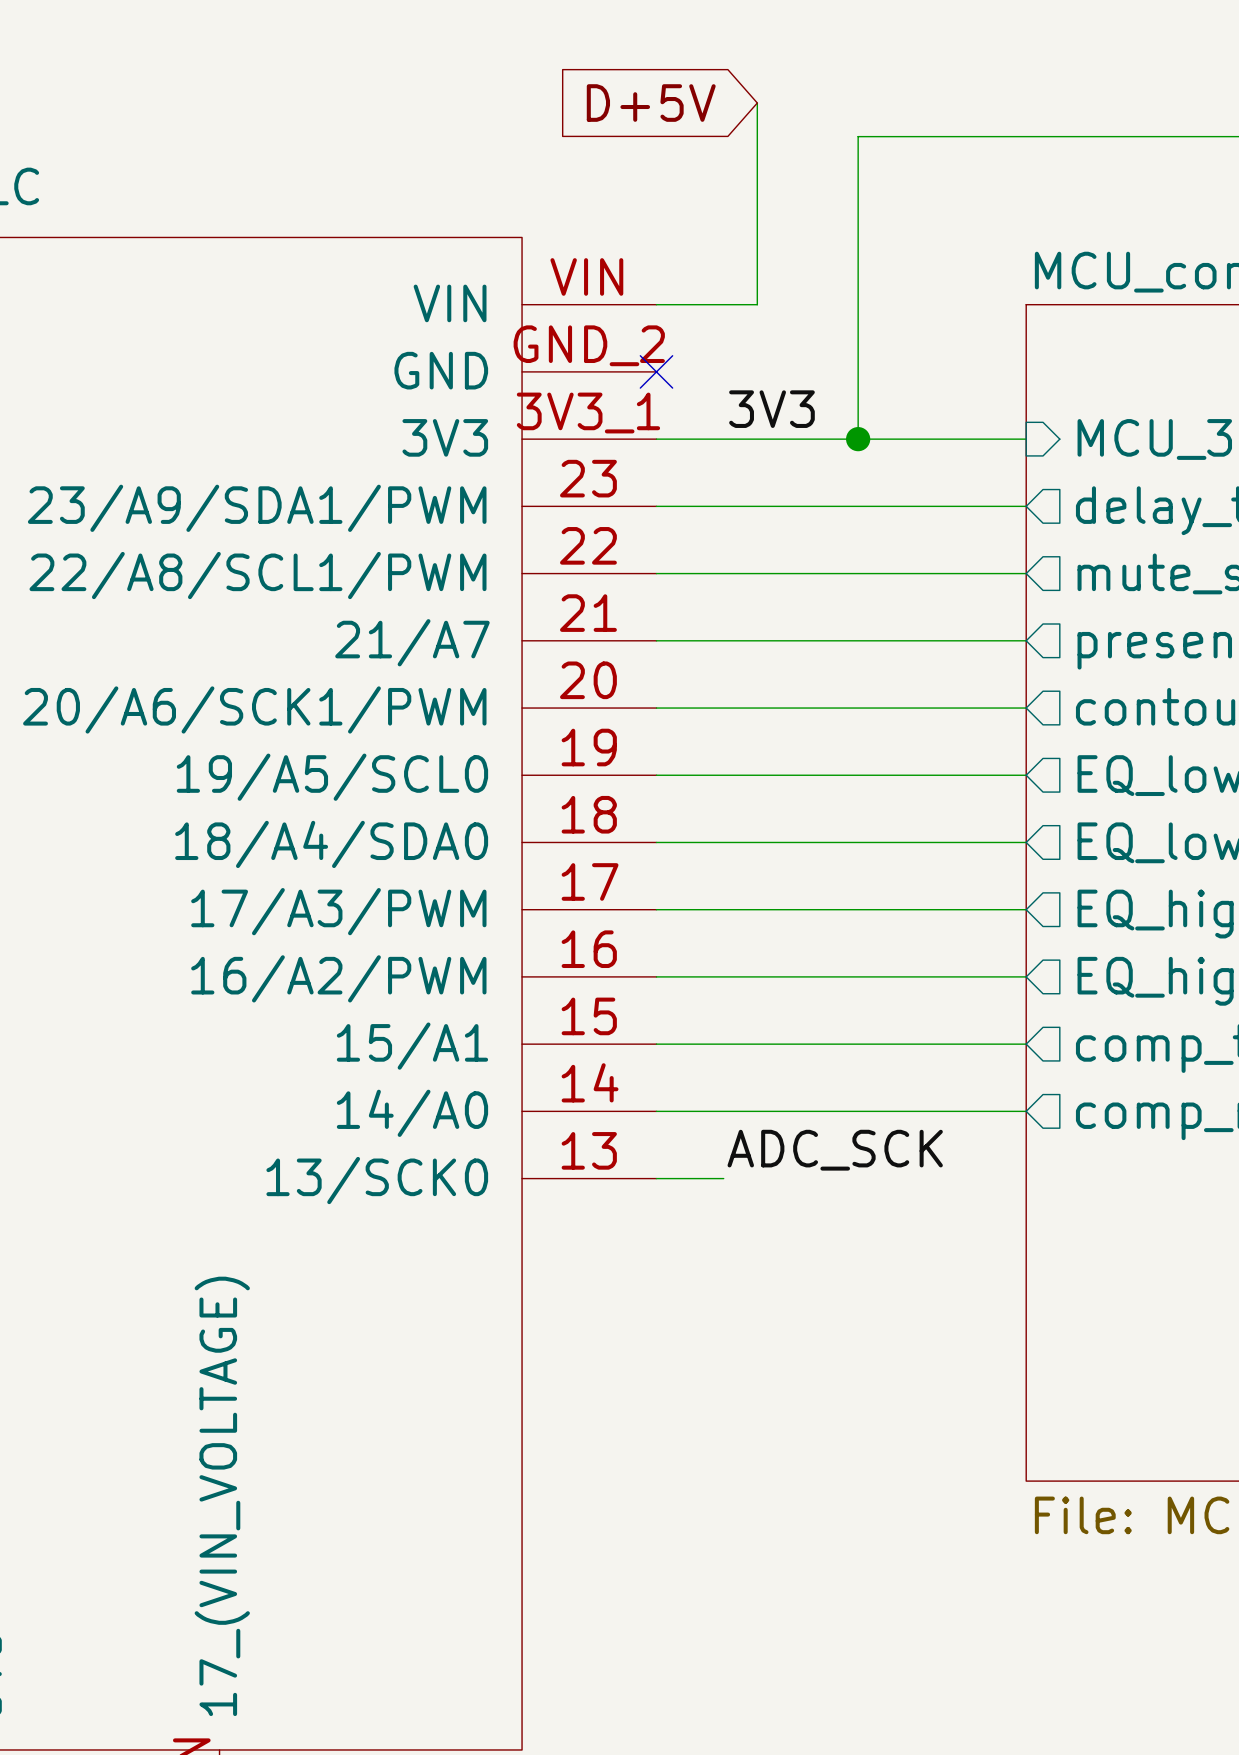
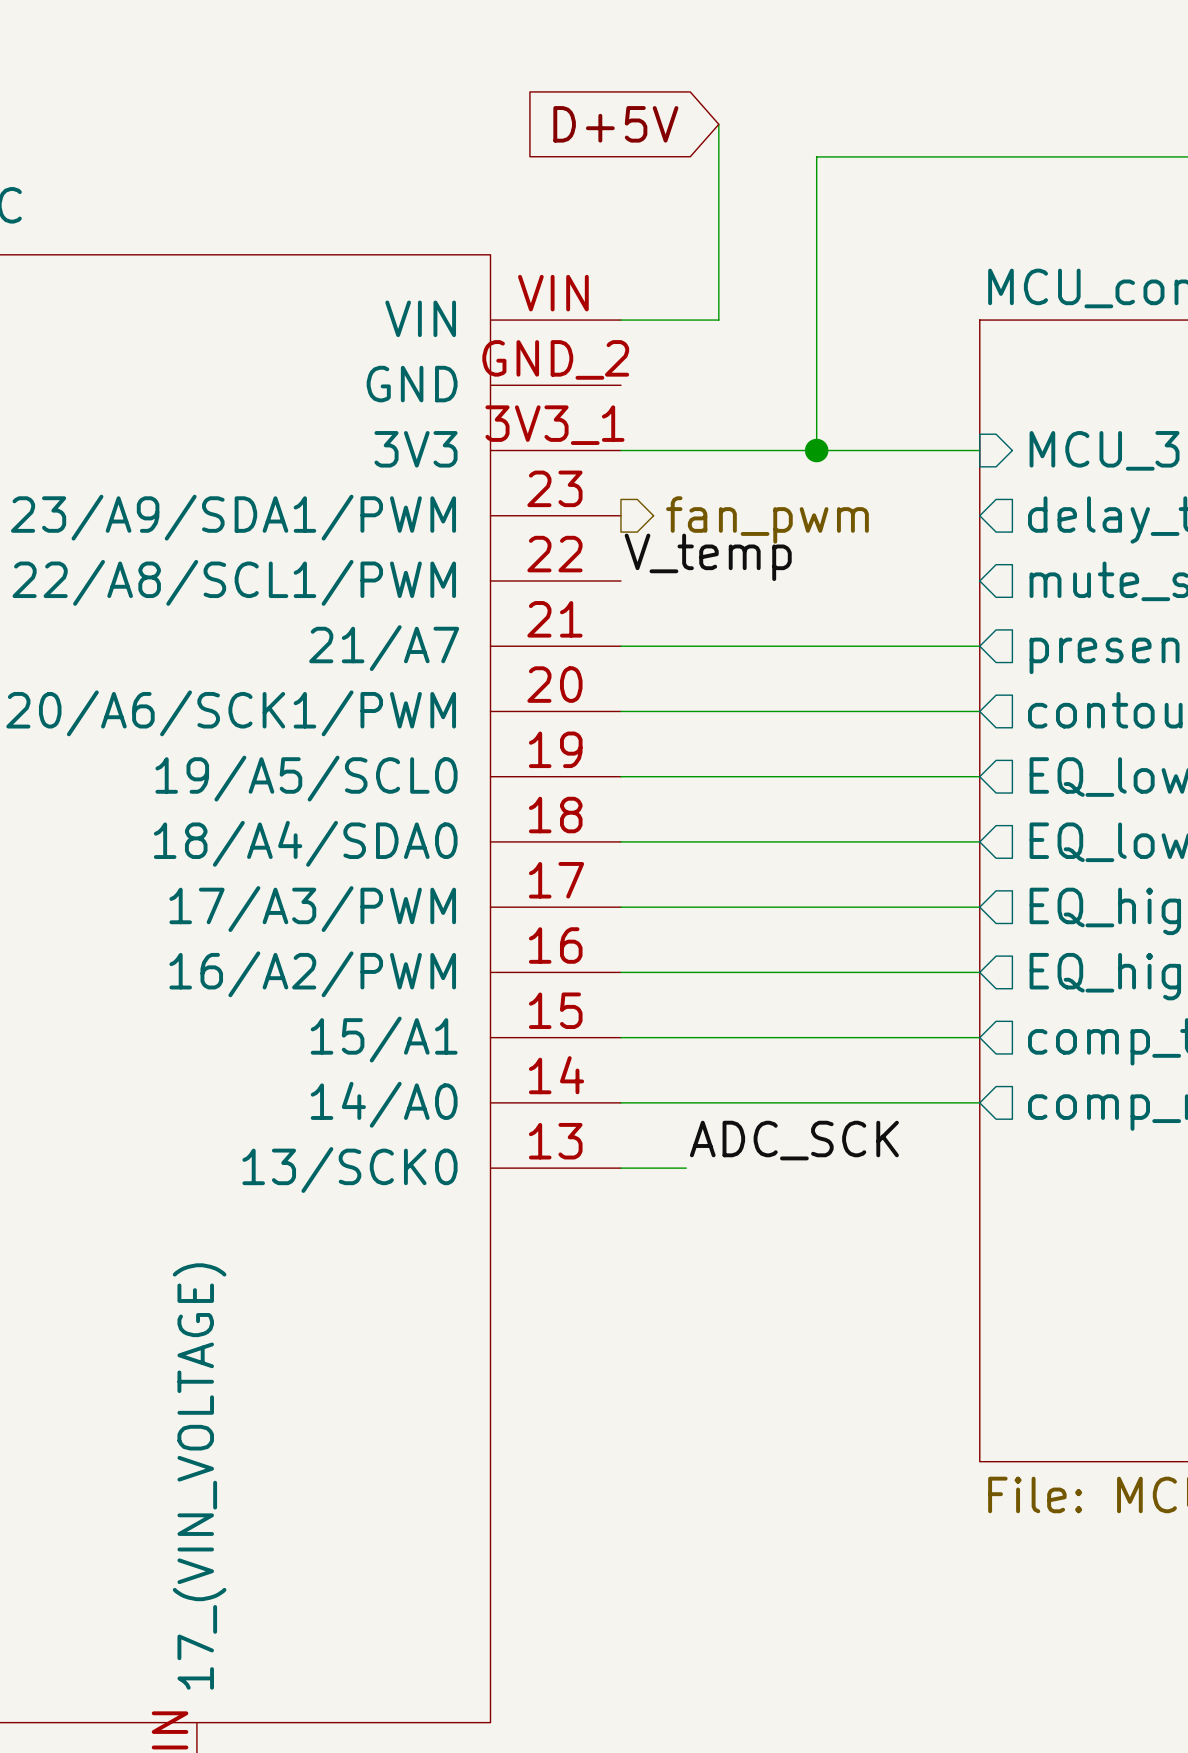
no-connect mark: (656, 371) -> none
label: 3V3 (771, 409) -> none
wire: (656, 506) (1026, 506) -> none
hierarchical label: none -> fan_pwm (767, 519)
label: none -> V_temp (708, 557)
wire: (656, 573) (1026, 573) -> none

